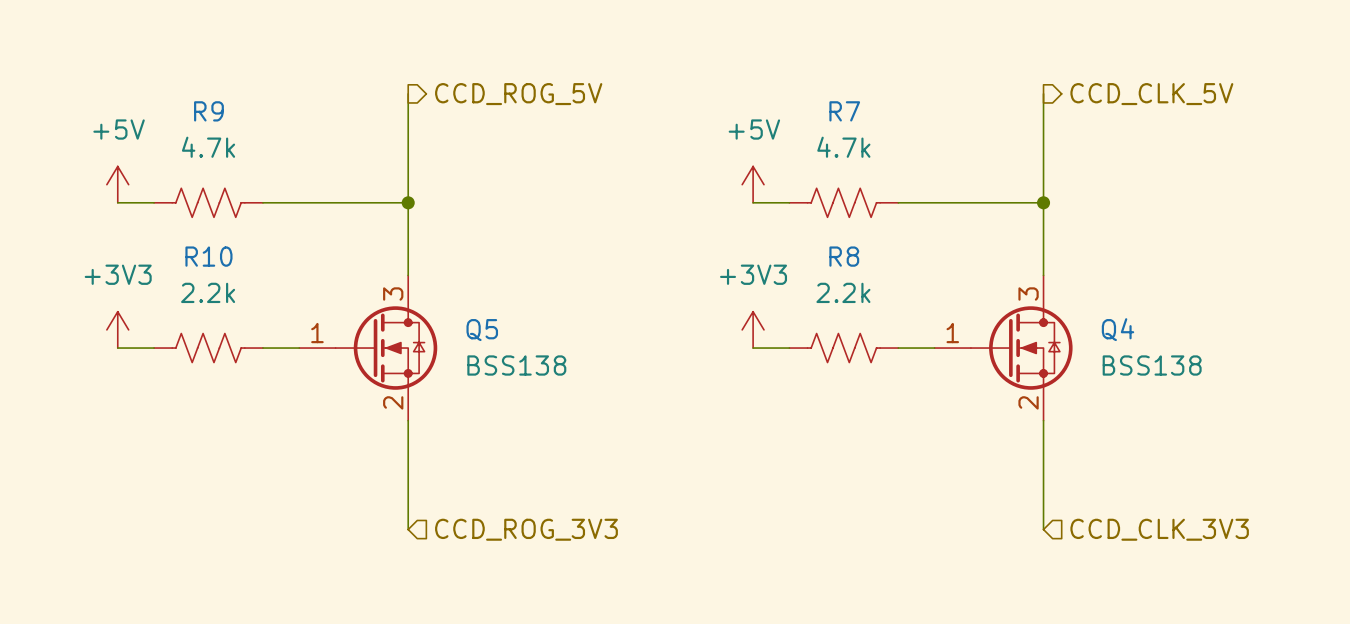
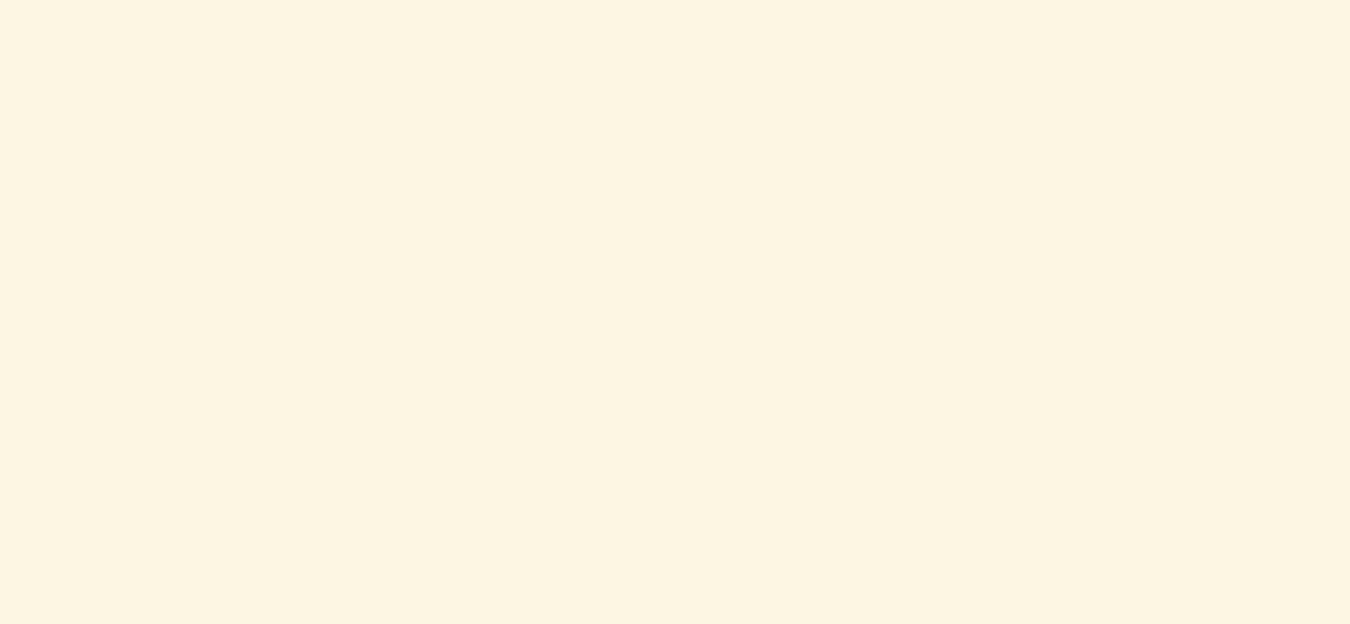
wire: (408, 93) (408, 275) -> none
wire: (1043, 93) (1043, 275) -> none
hierarchical label: CCD_ROG_5V (518, 94) -> none
hierarchical label: CCD_CLK_5V (1151, 94) -> none
power symbol: +5V (117, 184) -> none
power symbol: +5V (753, 184) -> none
wire: (117, 202) (154, 202) -> none
R9: 4.7k (208, 202) -> none
wire: (262, 202) (408, 202) -> none
junction: (408, 202) -> none
wire: (753, 202) (789, 202) -> none
R7: 4.7k (843, 202) -> none
wire: (898, 202) (1043, 202) -> none
junction: (1043, 202) -> none
power symbol: +3V3 (117, 329) -> none
power symbol: +3V3 (753, 329) -> none
wire: (117, 348) (154, 348) -> none
R10: 2.2k (208, 348) -> none
wire: (262, 348) (299, 348) -> none
Q5: BSS138 (368, 348) -> none
wire: (753, 348) (789, 348) -> none
R8: 2.2k (843, 348) -> none
wire: (898, 348) (934, 348) -> none
Q4: BSS138 (1003, 348) -> none
wire: (408, 420) (408, 529) -> none
wire: (1043, 420) (1043, 529) -> none
hierarchical label: CCD_ROG_3V3 (526, 529) -> none
hierarchical label: CCD_CLK_3V3 (1159, 529) -> none

